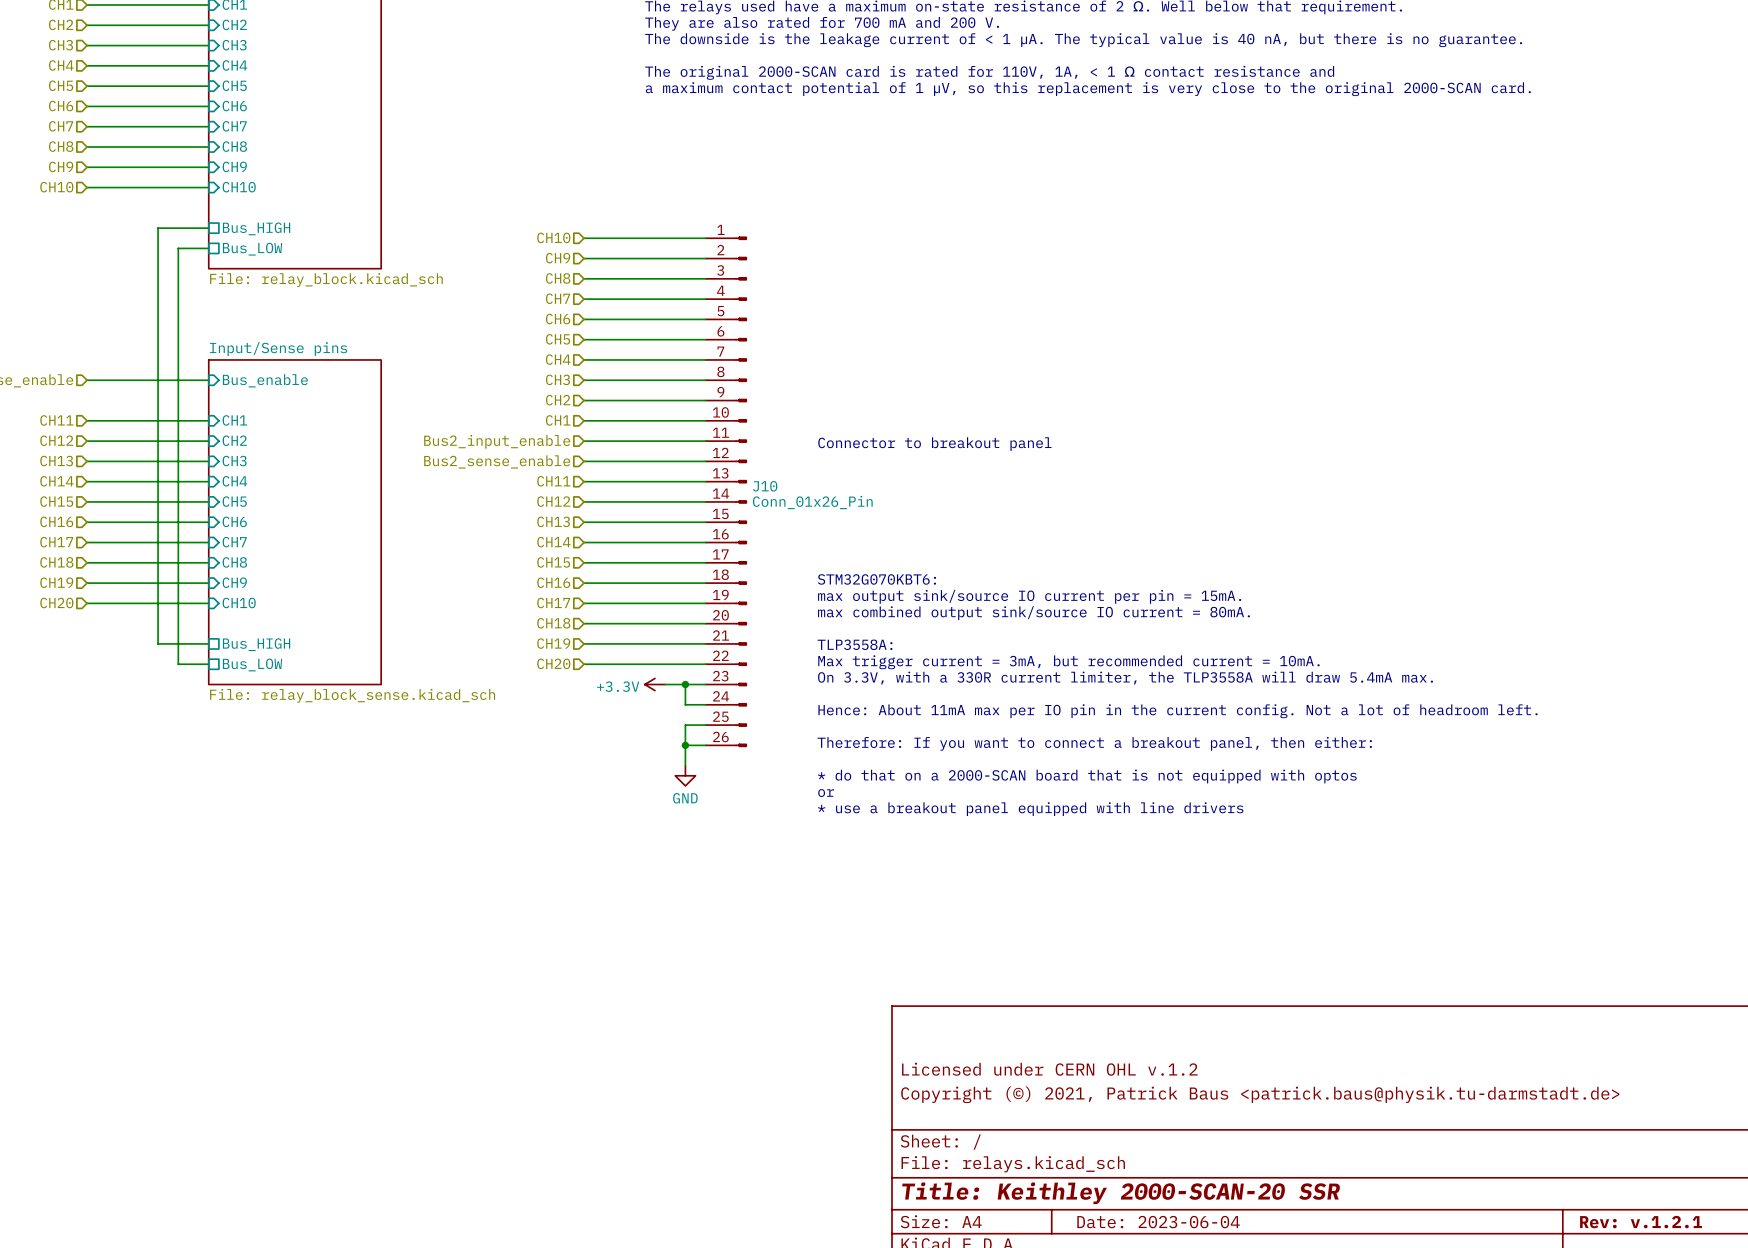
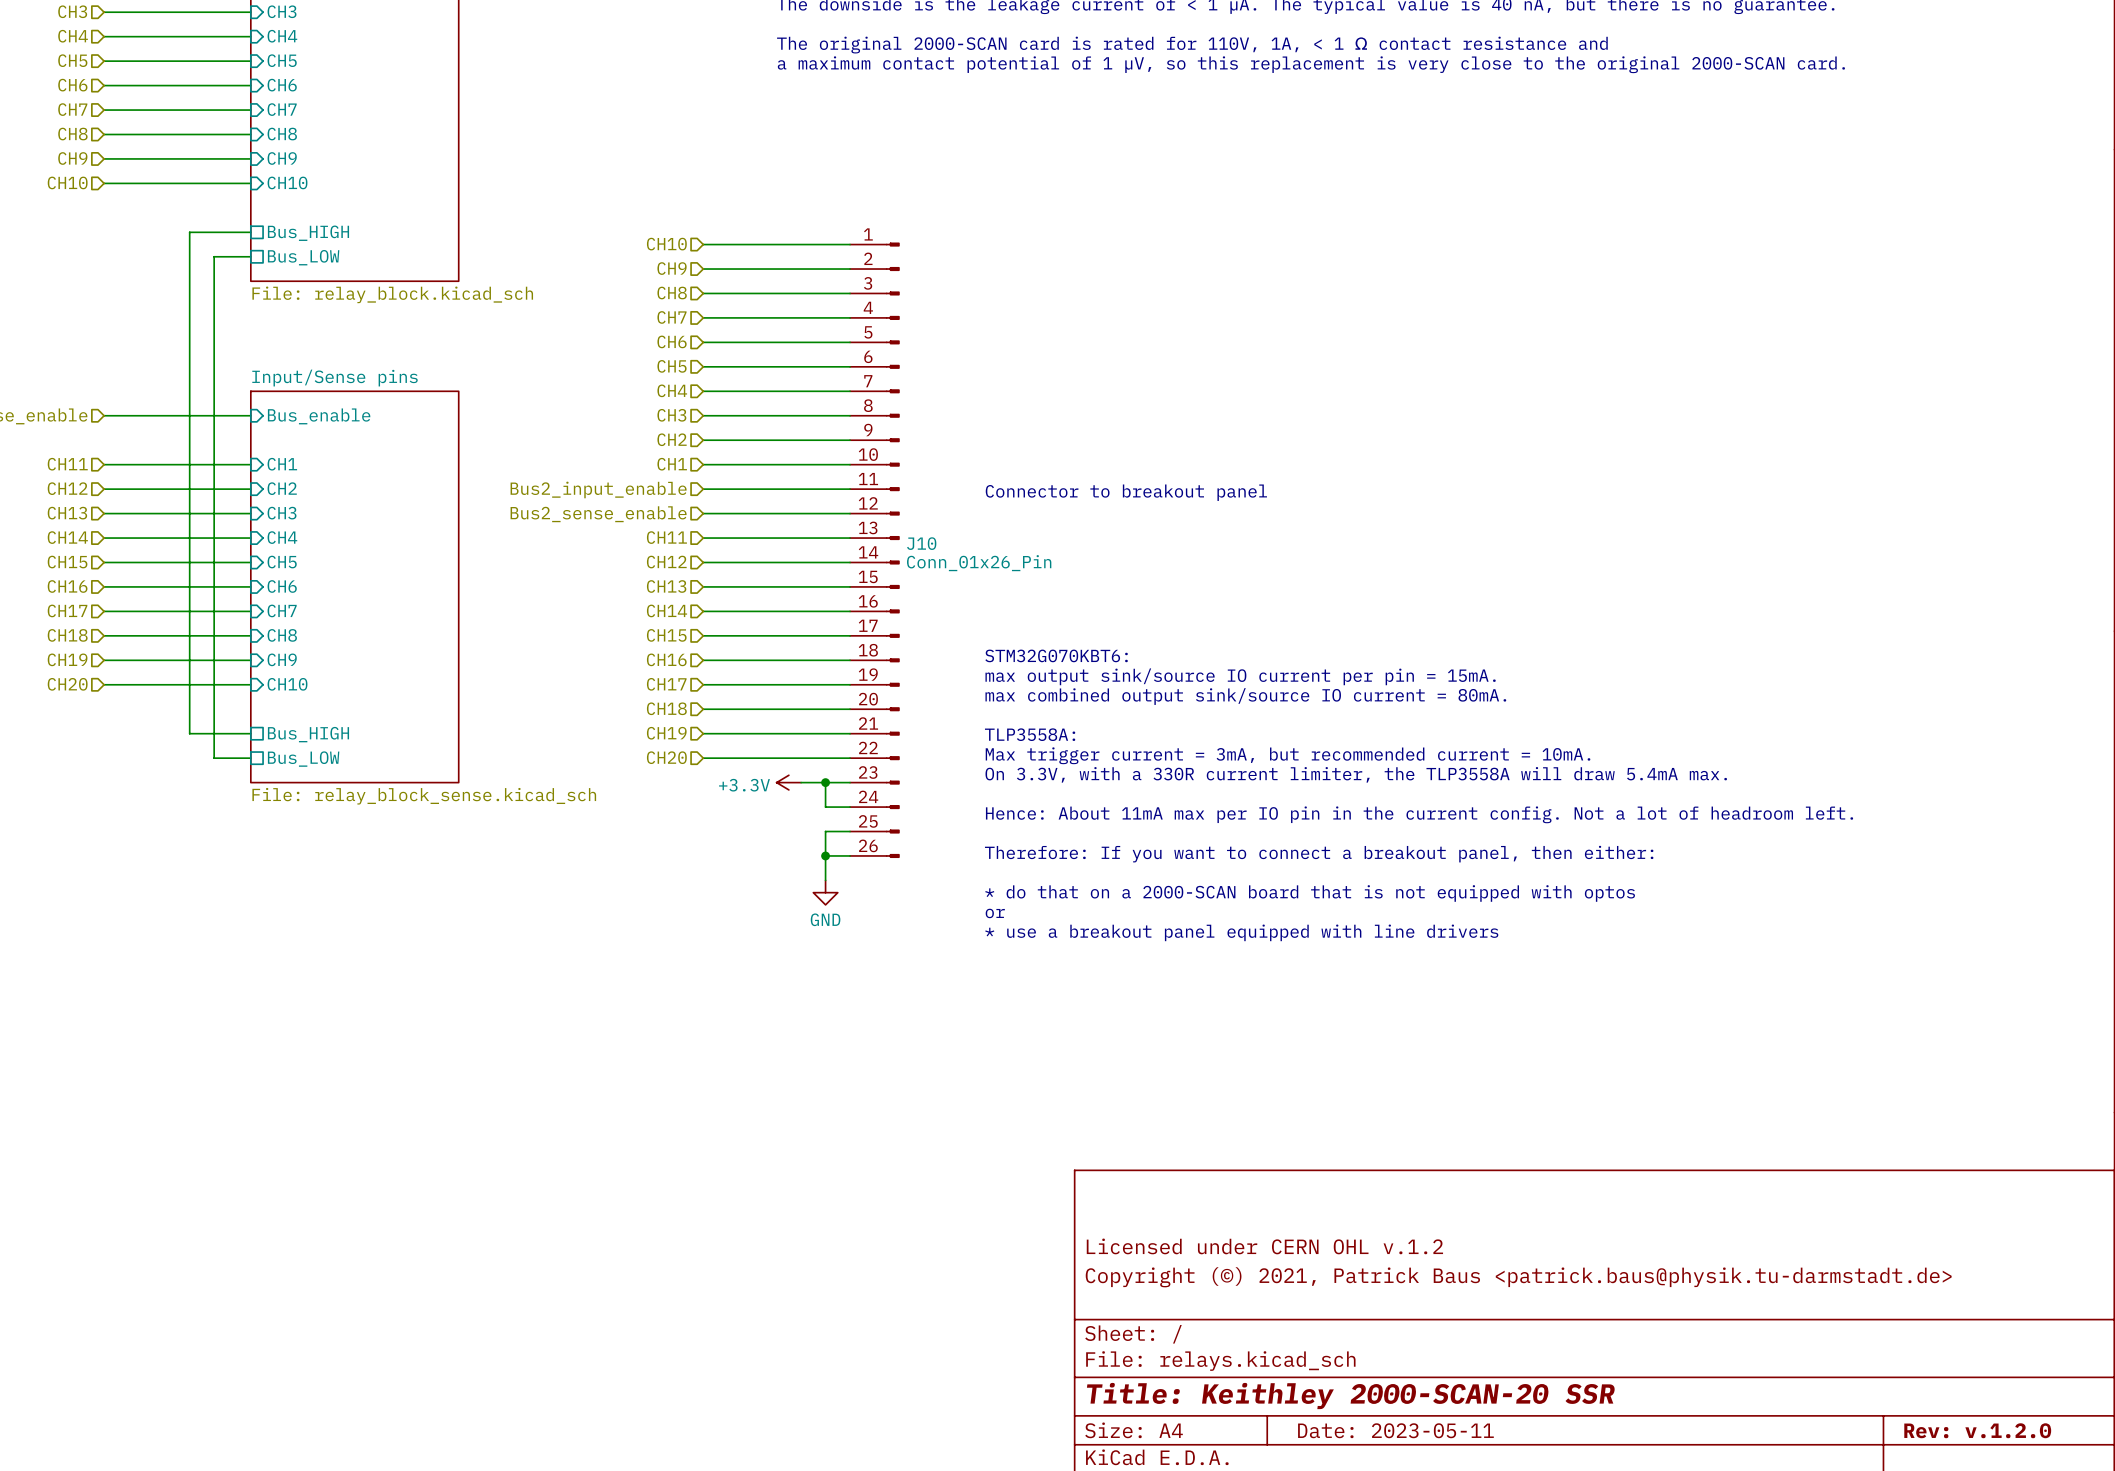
title block: Date: 2023-06-04 (1158, 1222) -> Date: 2023-05-11 (1395, 1430)
title block: Rev: v.1.2.1 (1641, 1222) -> Rev: v.1.2.0 (1977, 1430)

